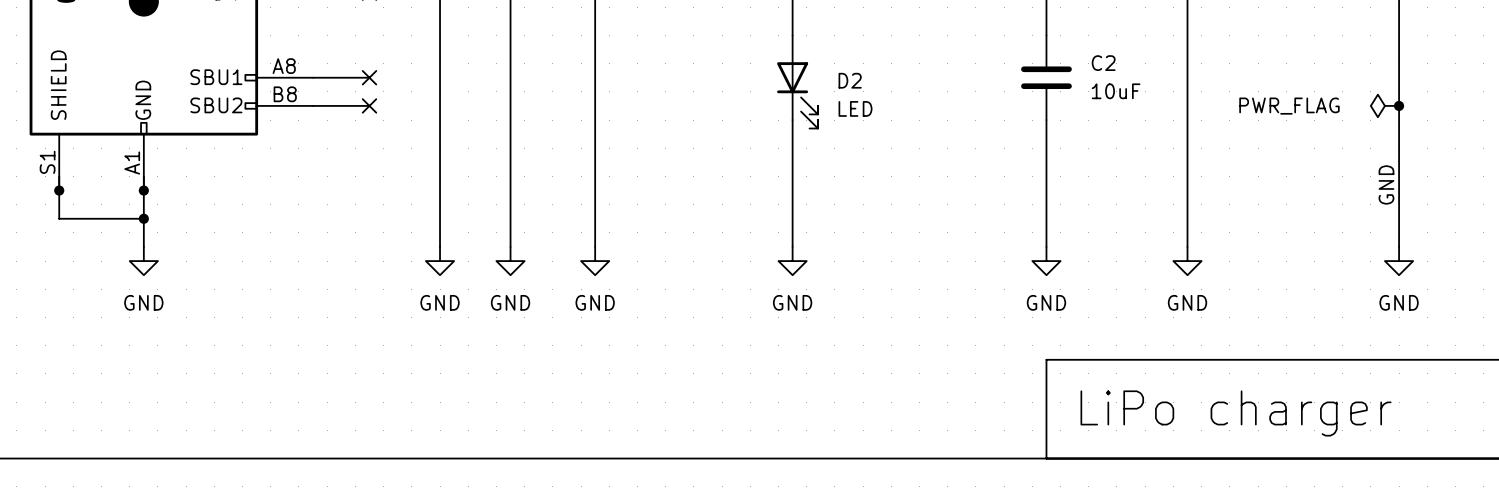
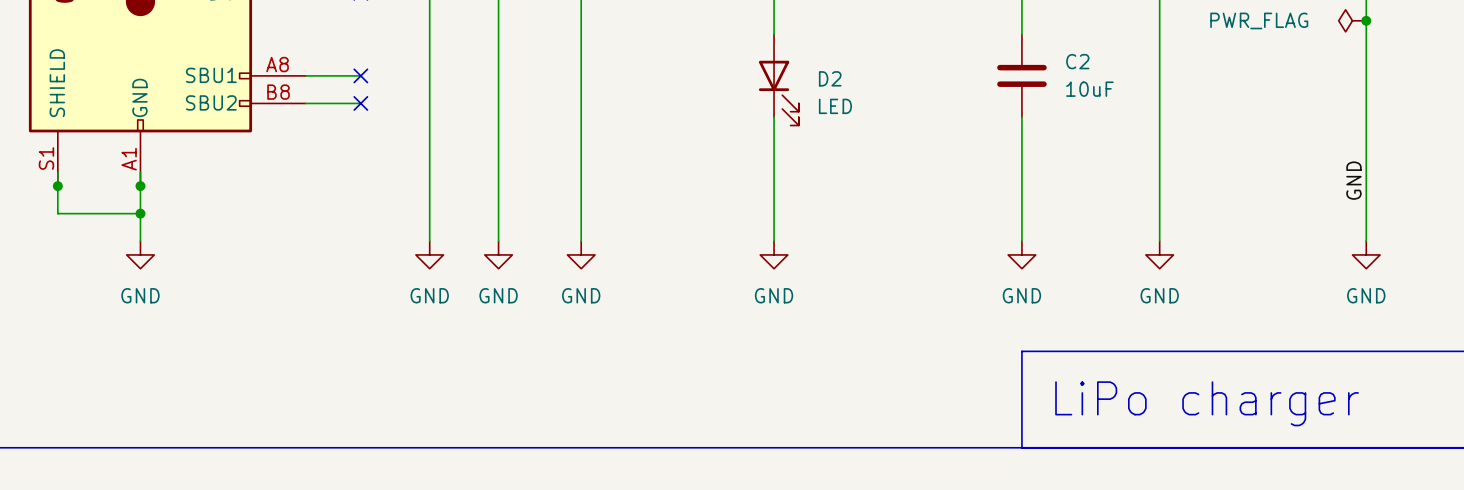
junction: none -> (1366, 20)
power symbol position: PWR_FLAG (1384, 105) -> PWR_FLAG (1352, 20)
junction: (1399, 105) -> none

